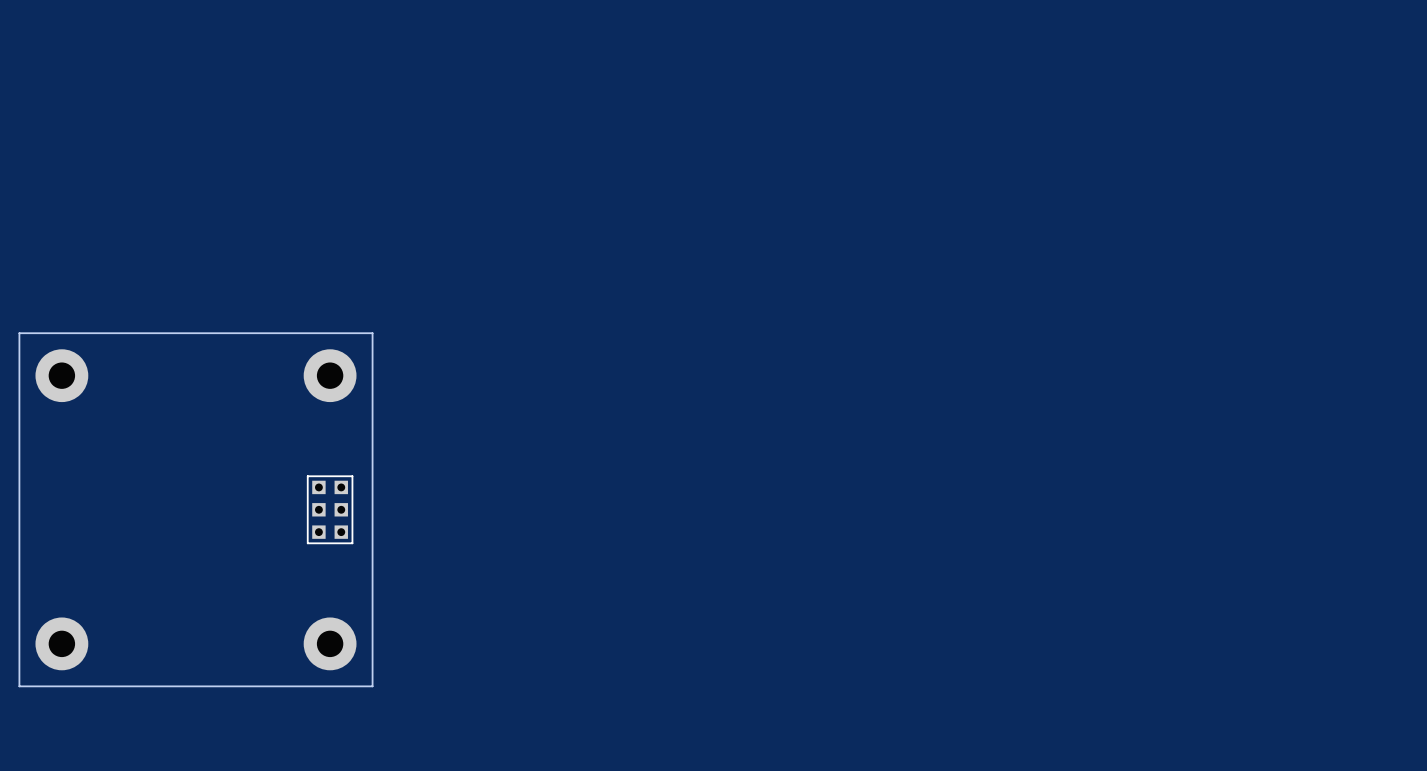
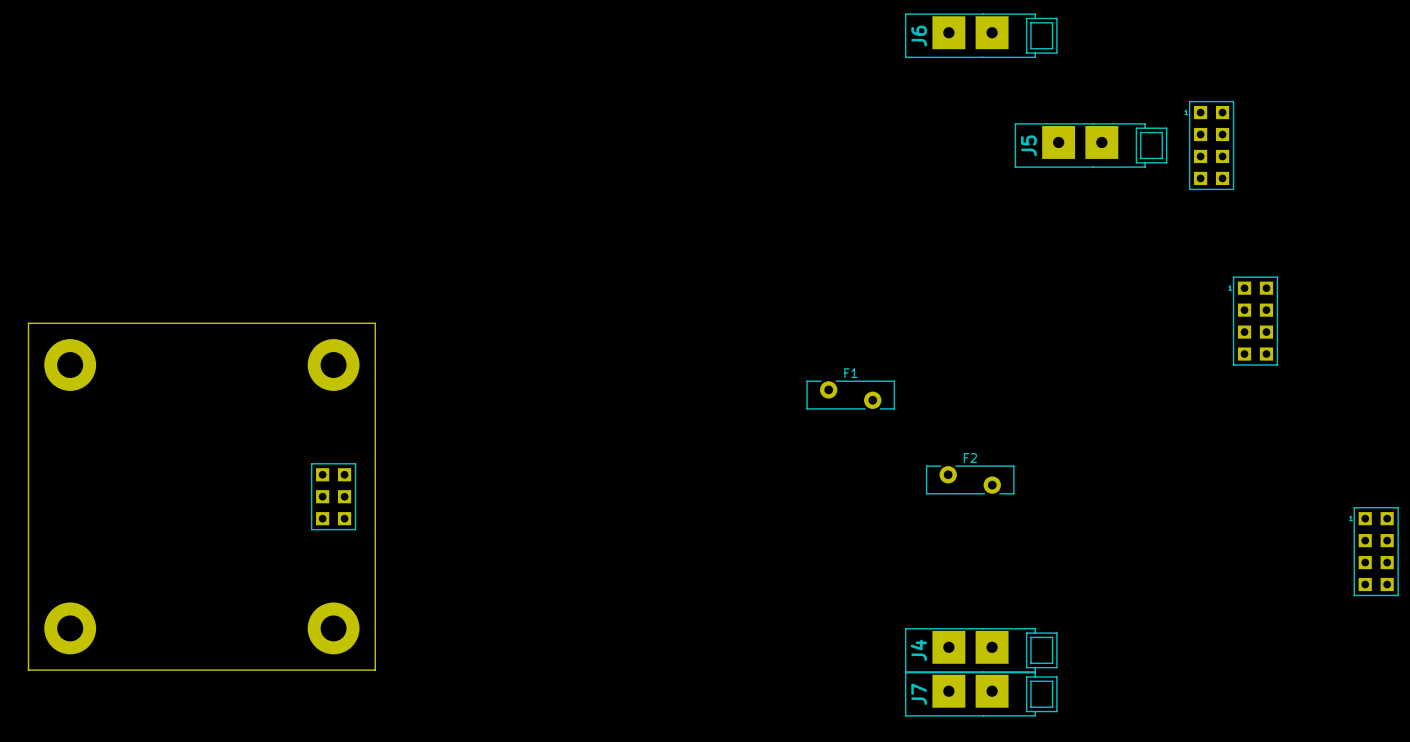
J6: none -> (981, 35)
J5: none -> (1091, 145)
part: none -> (1211, 145)
part: none -> (1255, 321)
F1: none -> (850, 395)
F2: none -> (970, 479)
part: none -> (1376, 551)
J4: none -> (981, 650)
J7: none -> (981, 694)

